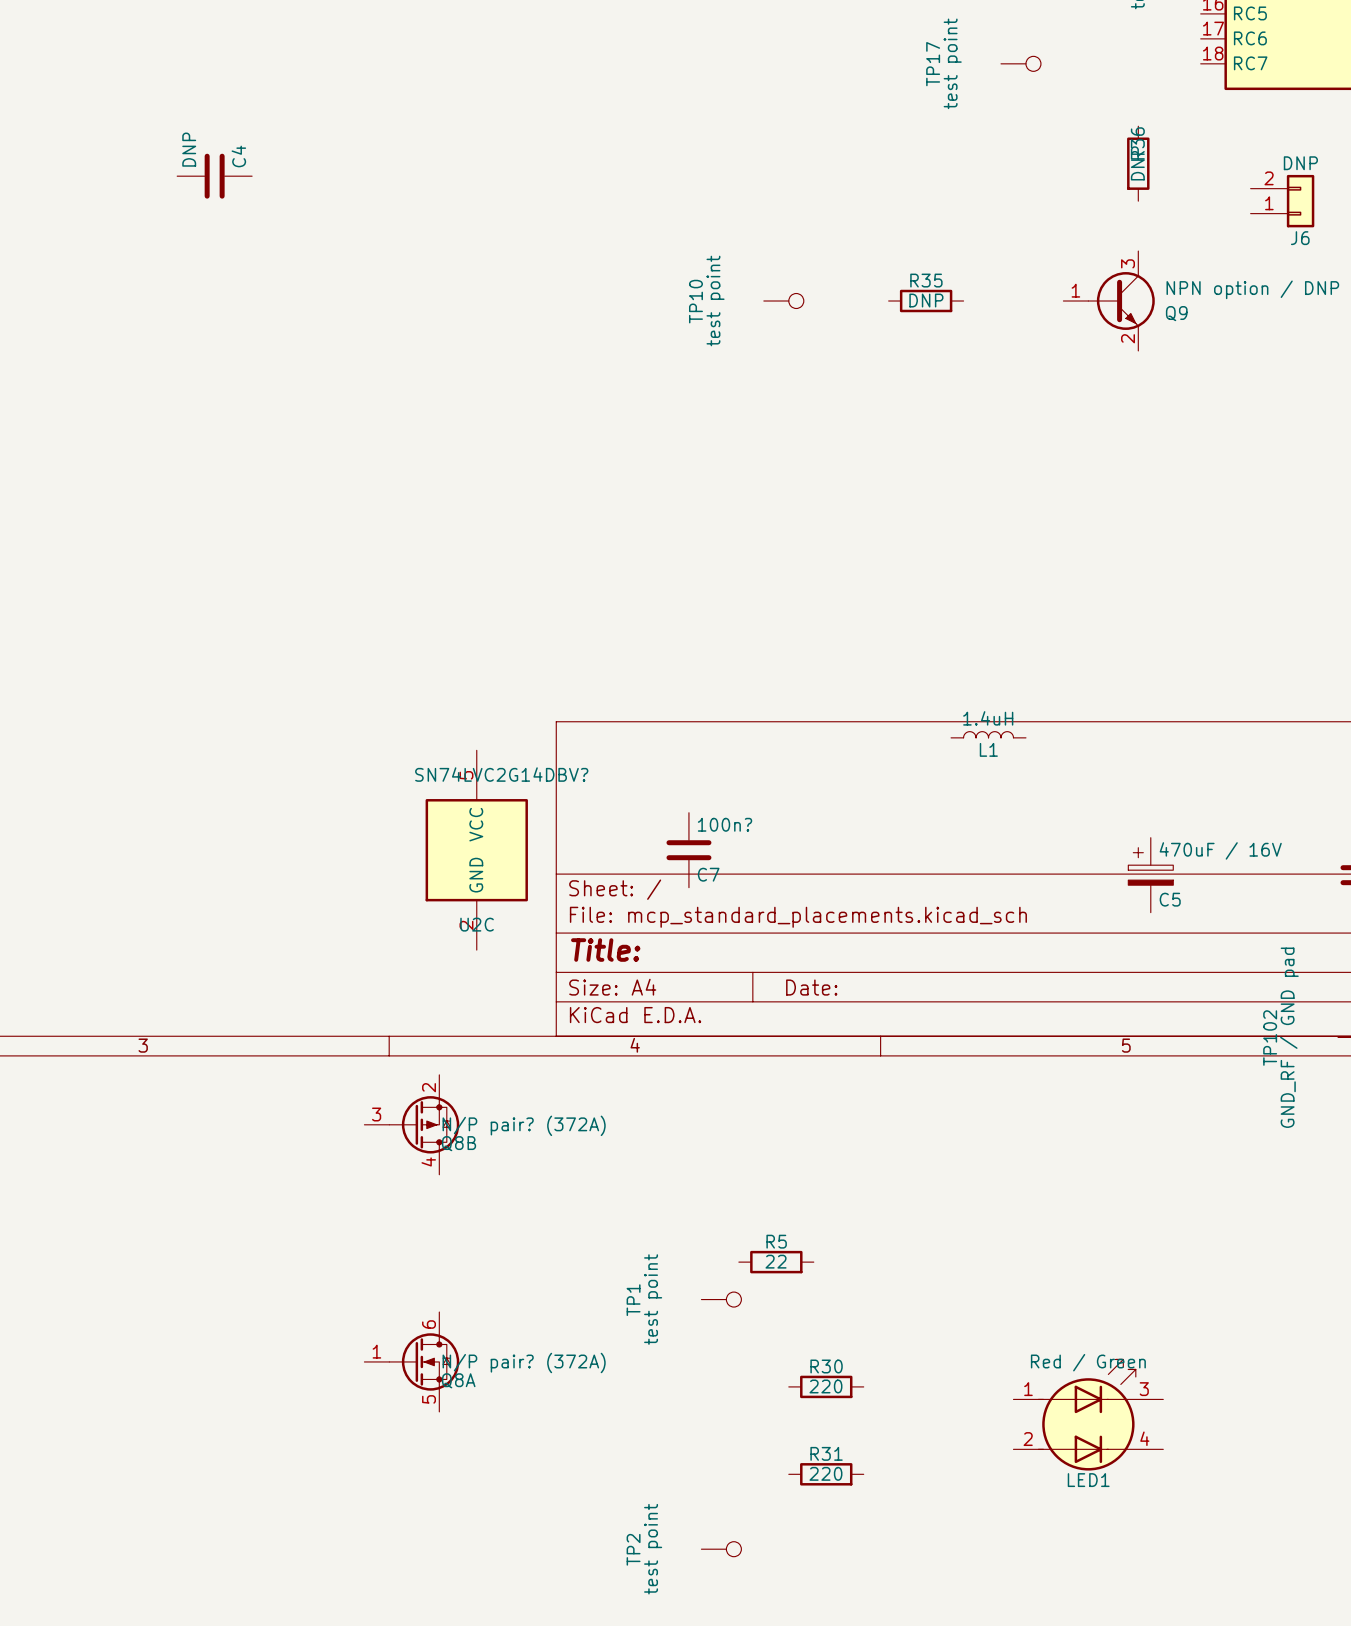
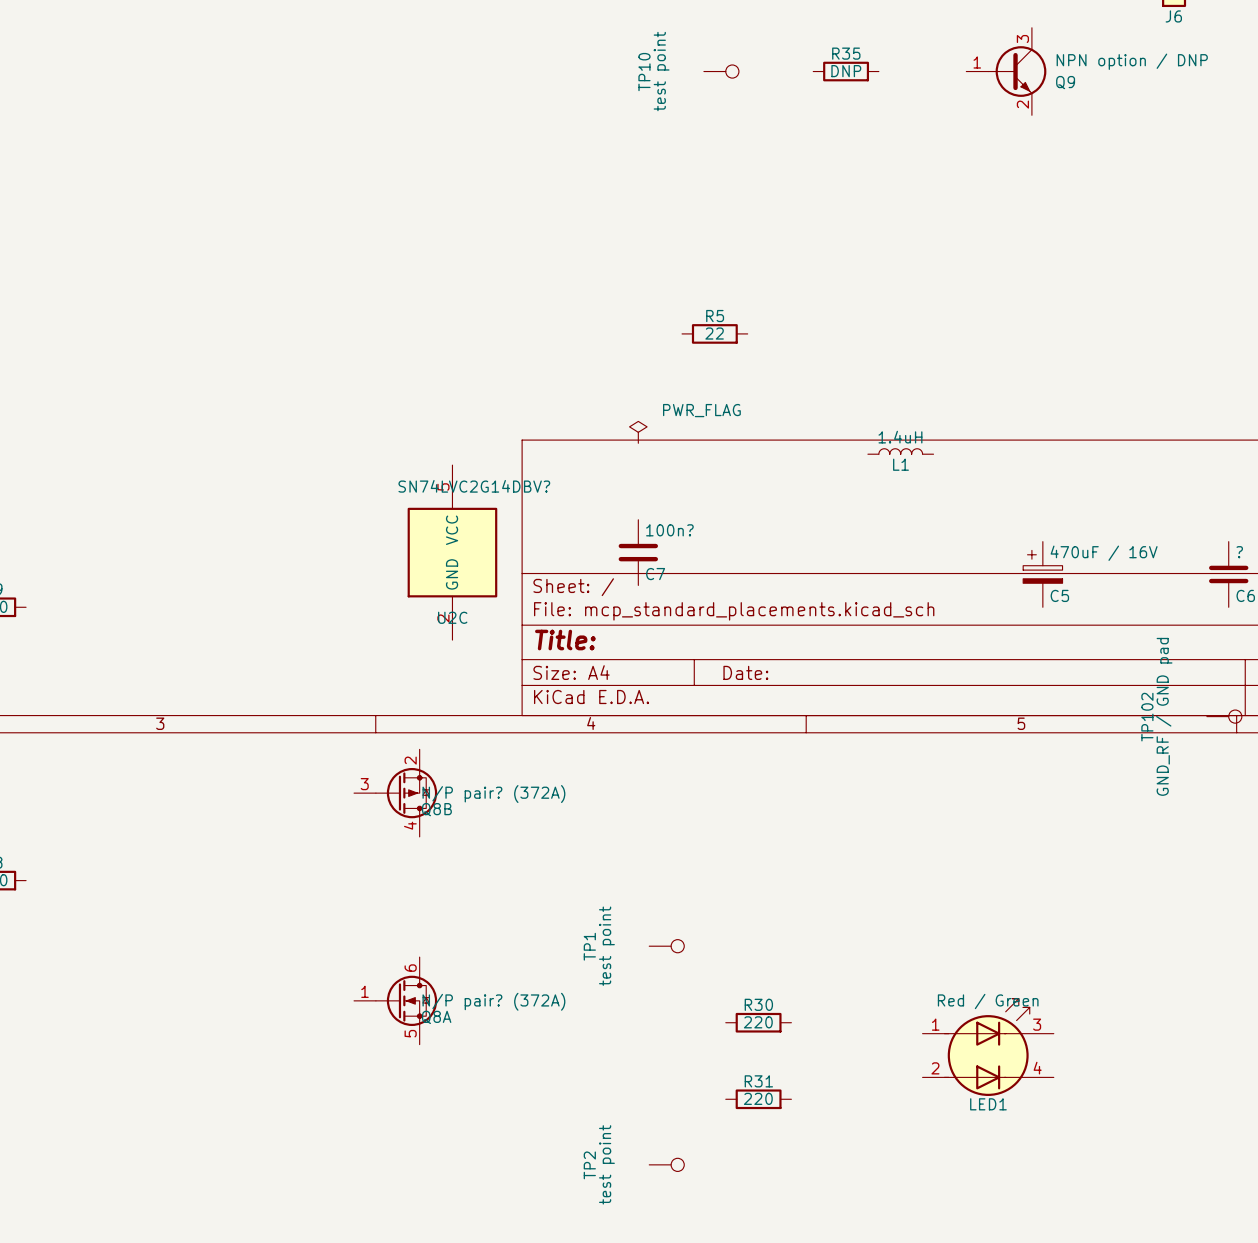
power symbol: none -> PWR_FLAG (638, 432)
R5 position: (776, 1262) -> (714, 333)

